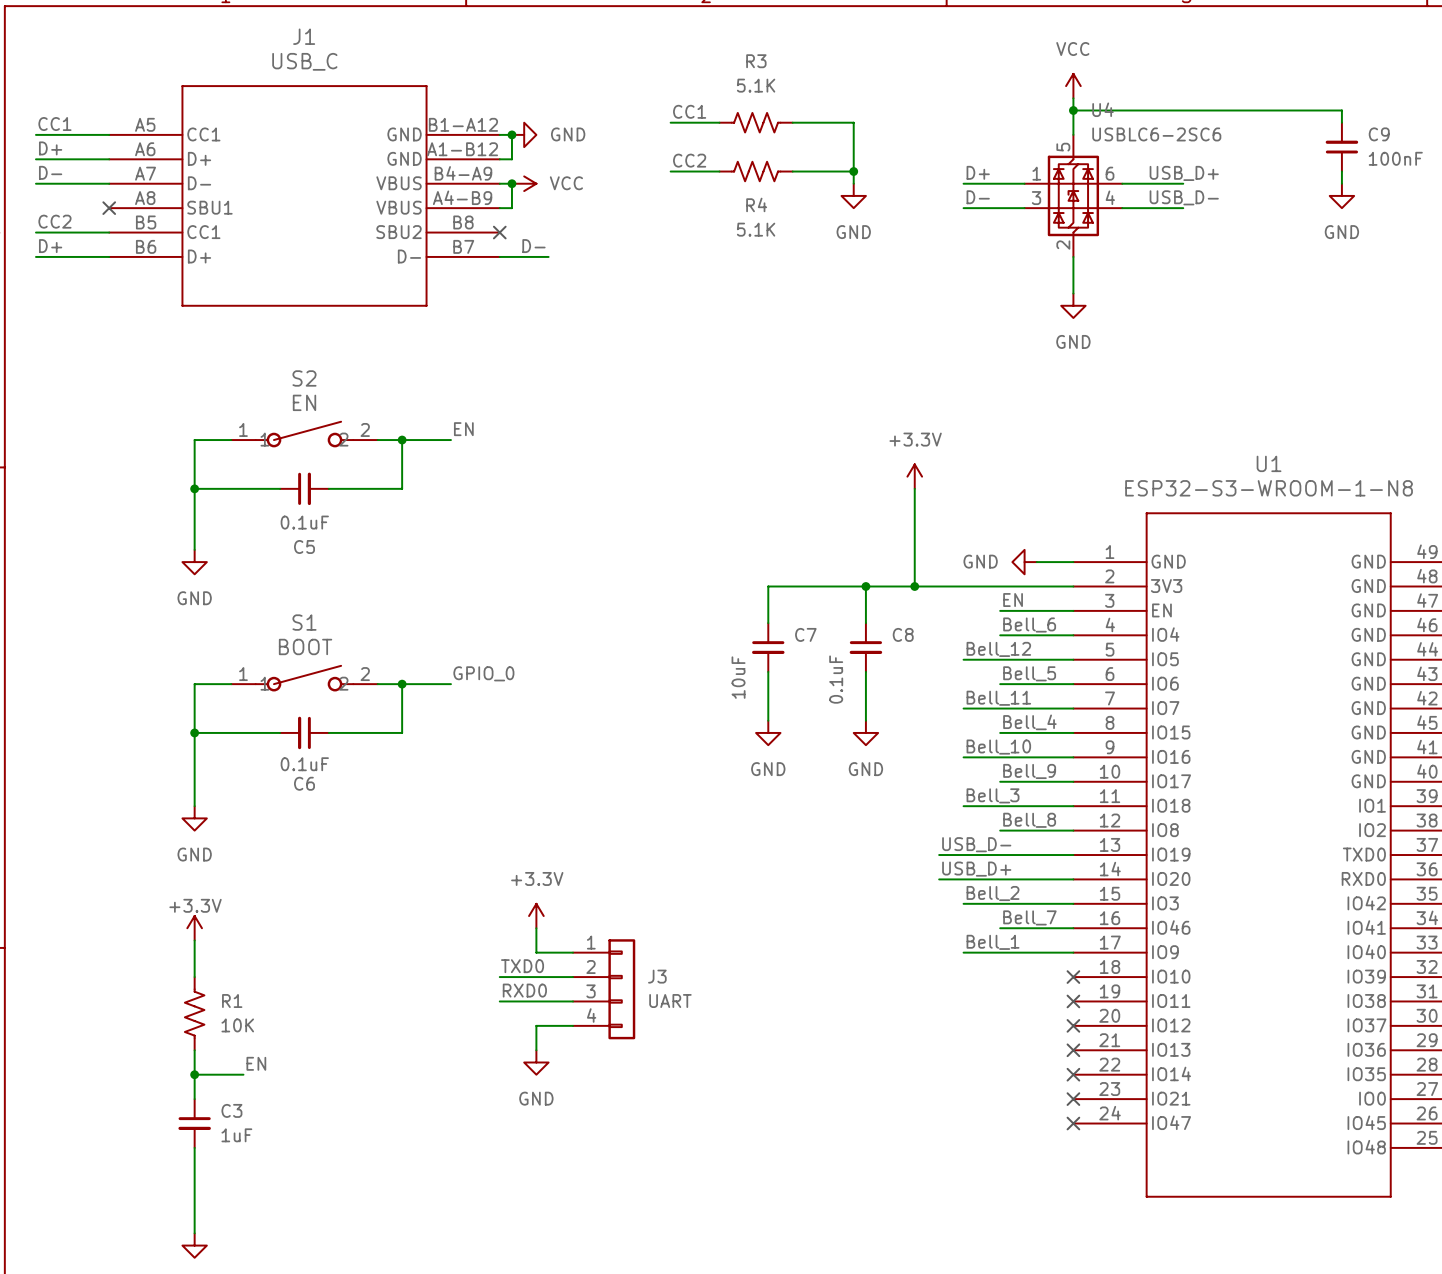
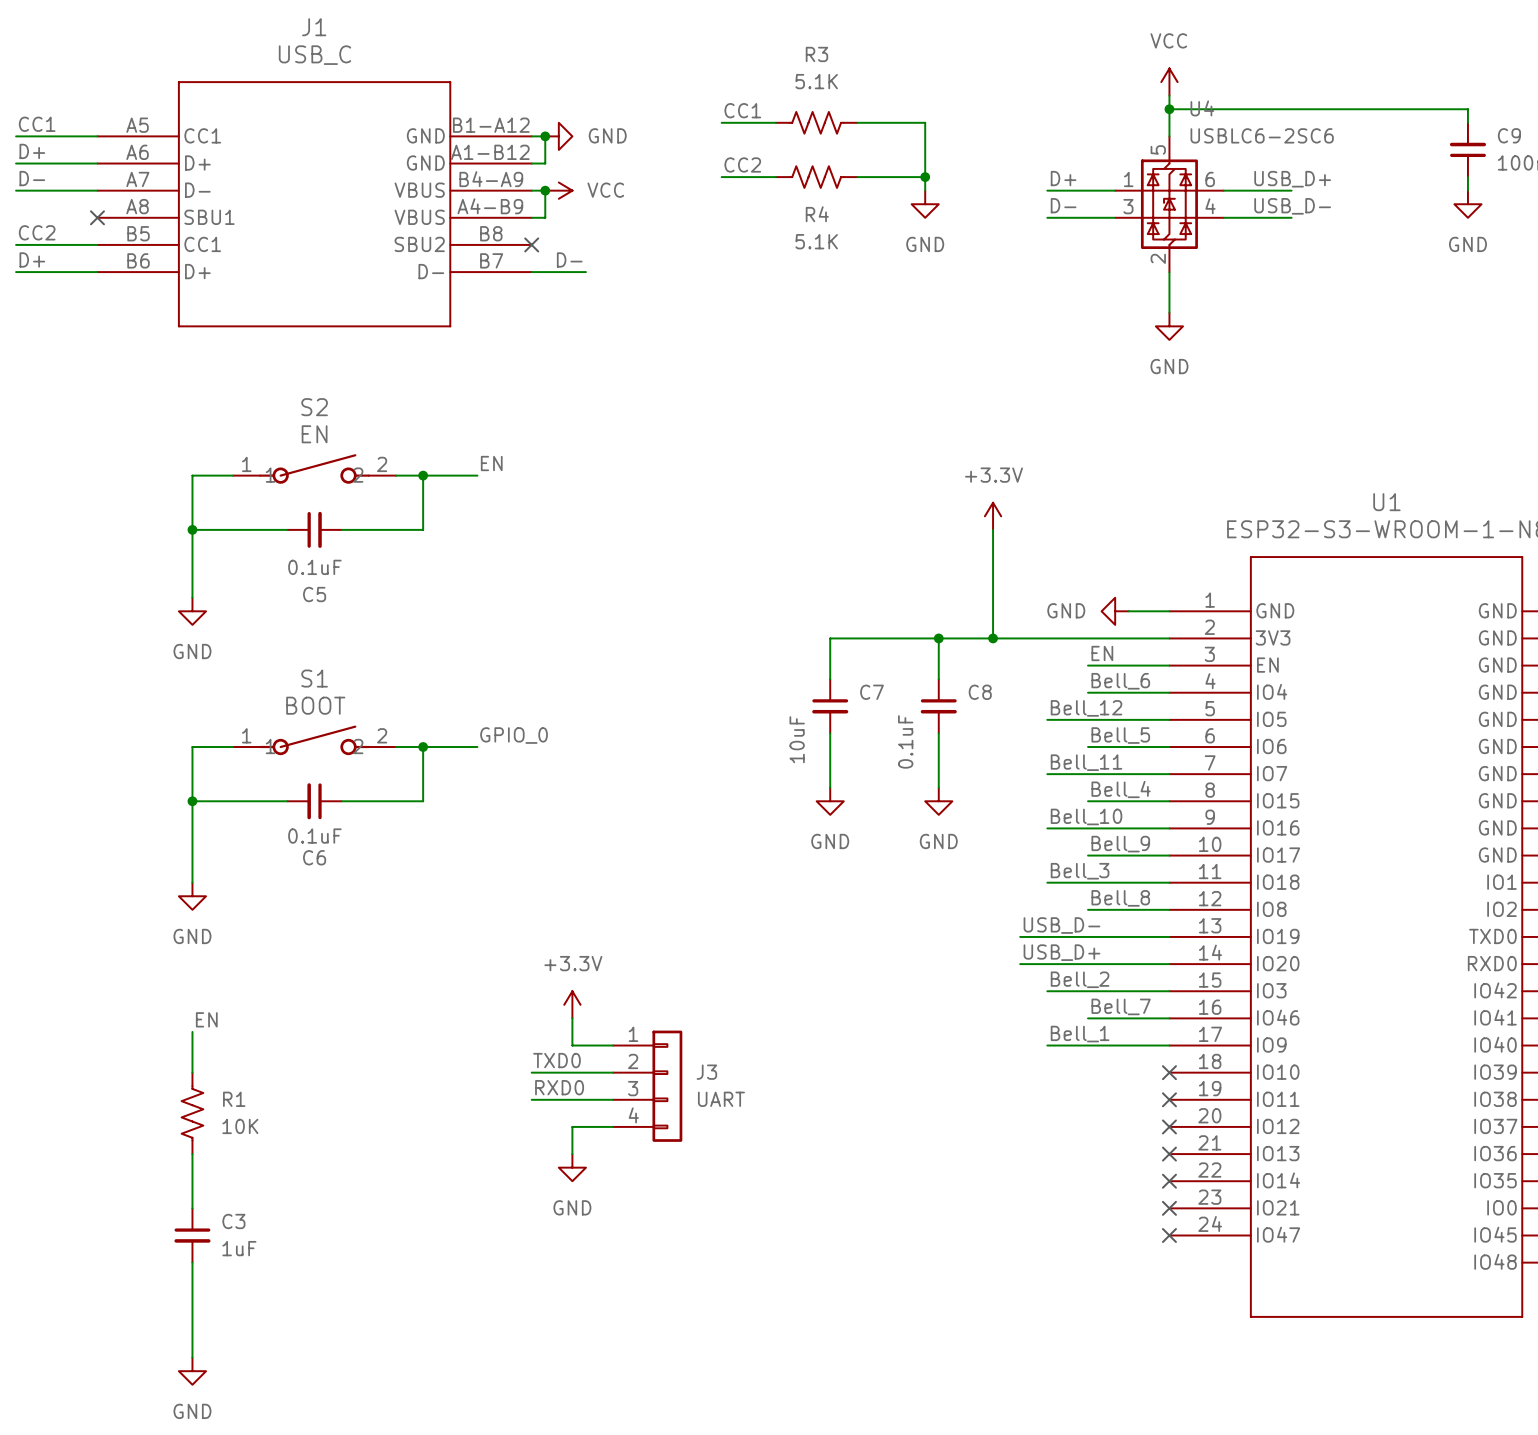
power symbol: +3.3V (194, 928) -> none
label position: EN (256, 1063) -> EN (206, 1019)
wire: (194, 1074) (243, 1074) -> none
junction: (194, 1074) -> none

